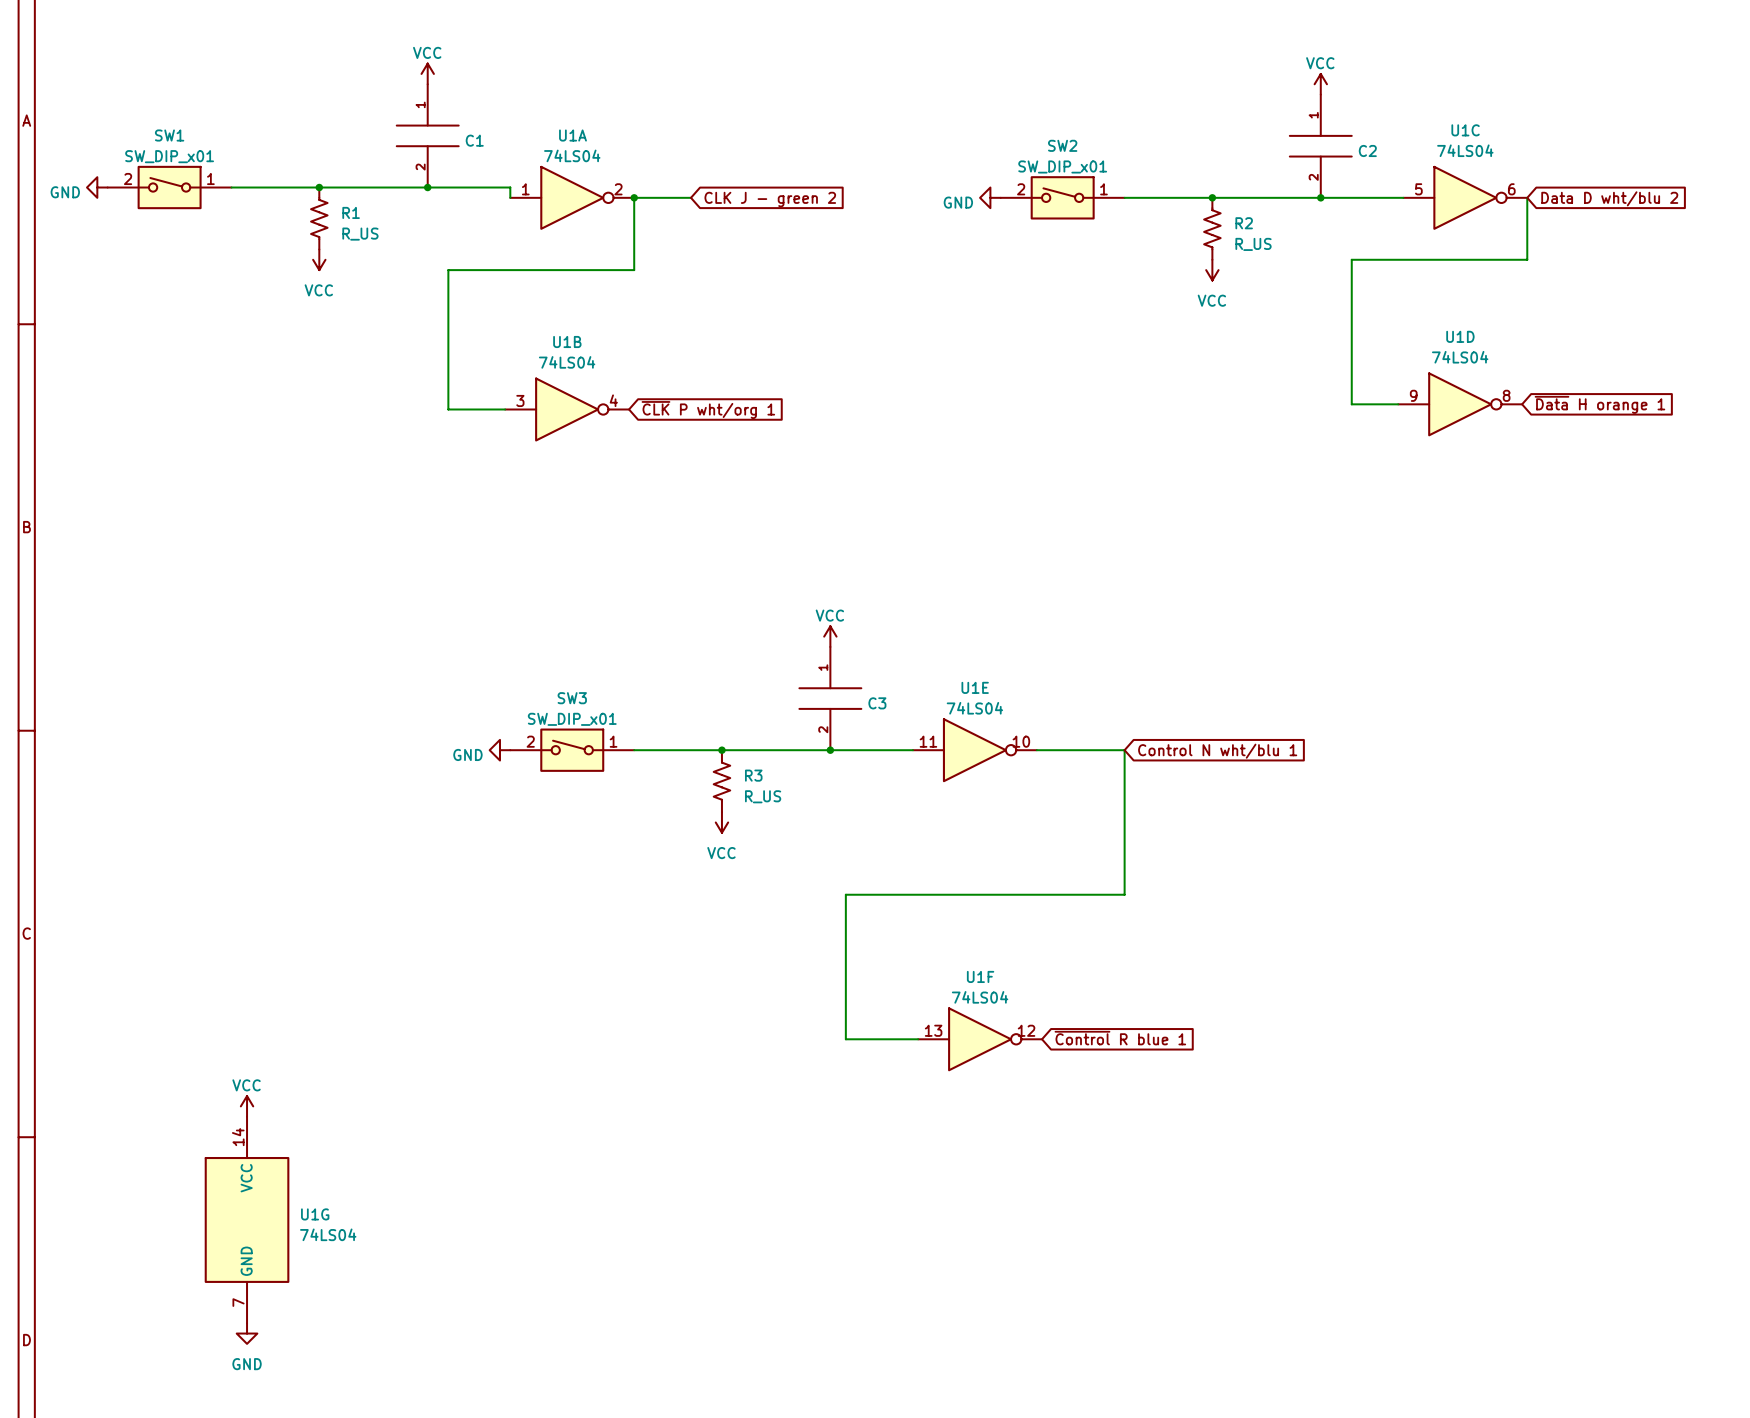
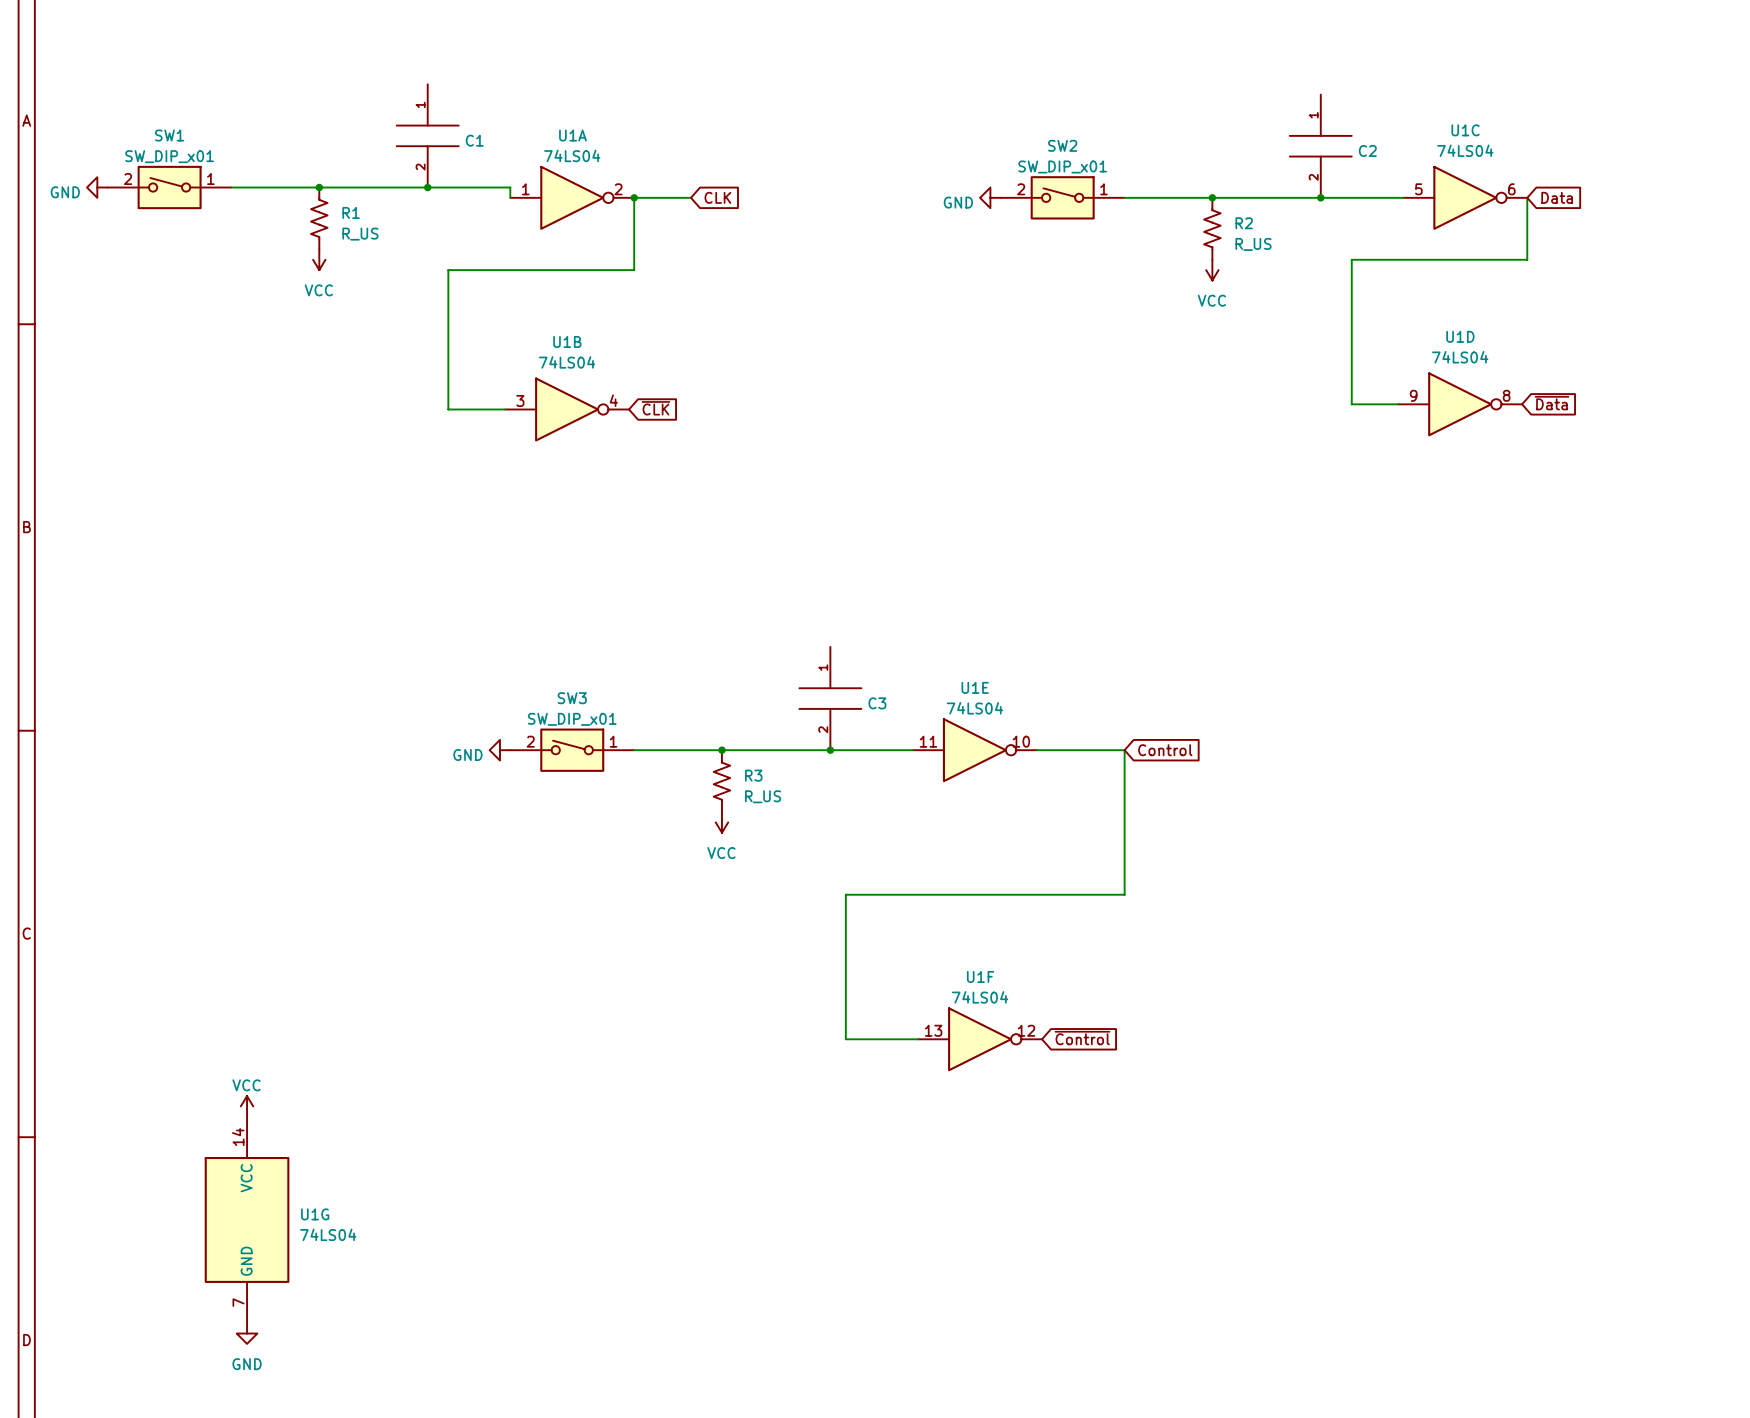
power symbol: VCC (427, 73) -> none
power symbol: VCC (1320, 84) -> none
global label: Data D wht/blu 2 (1609, 198) -> Data (1557, 197)
global label: CLK J - green 2 (770, 199) -> CLK (717, 197)
global label: ~{Data} H orange 1 (1599, 404) -> ~{Data} (1552, 403)
global label: ~{CLK} P wht/org 1 (708, 410) -> ~{CLK} (655, 408)
power symbol: VCC (830, 636) -> none
global label: Control N wht/blu 1 (1217, 751) -> Control (1165, 750)
global label: ~{Control} R blue 1 (1120, 1038) -> ~{Control} (1082, 1038)

